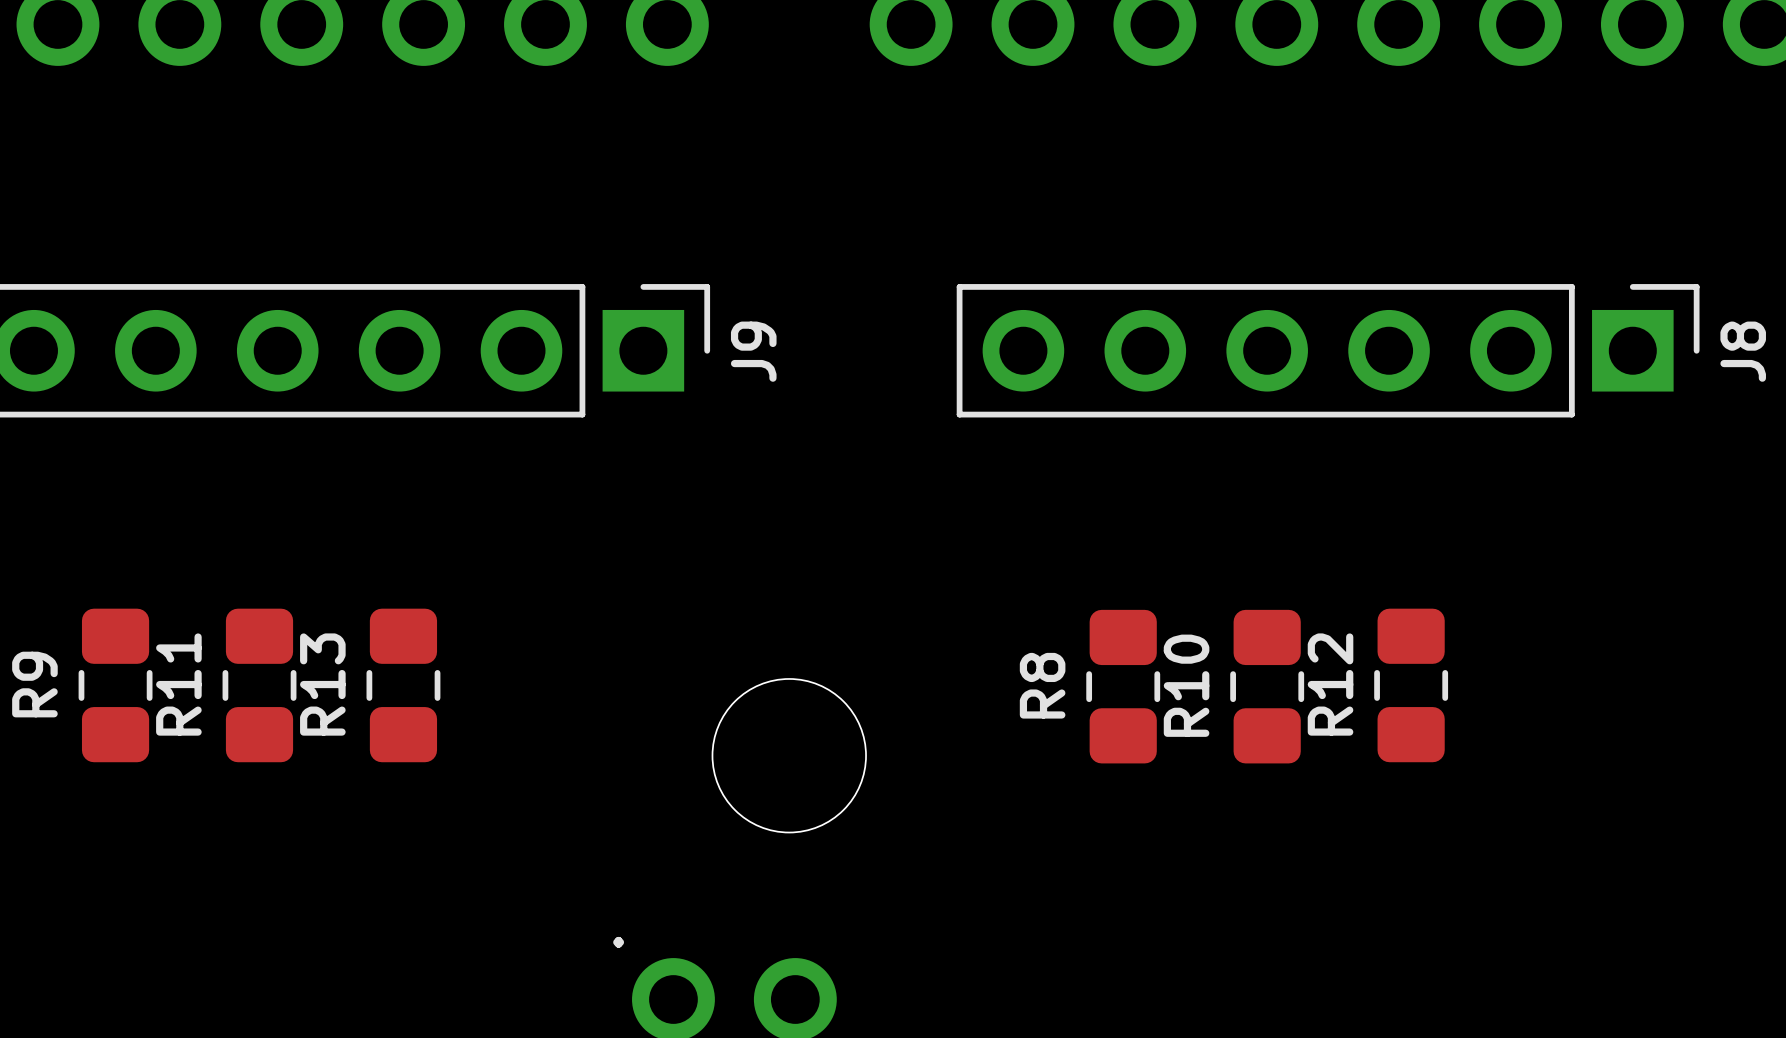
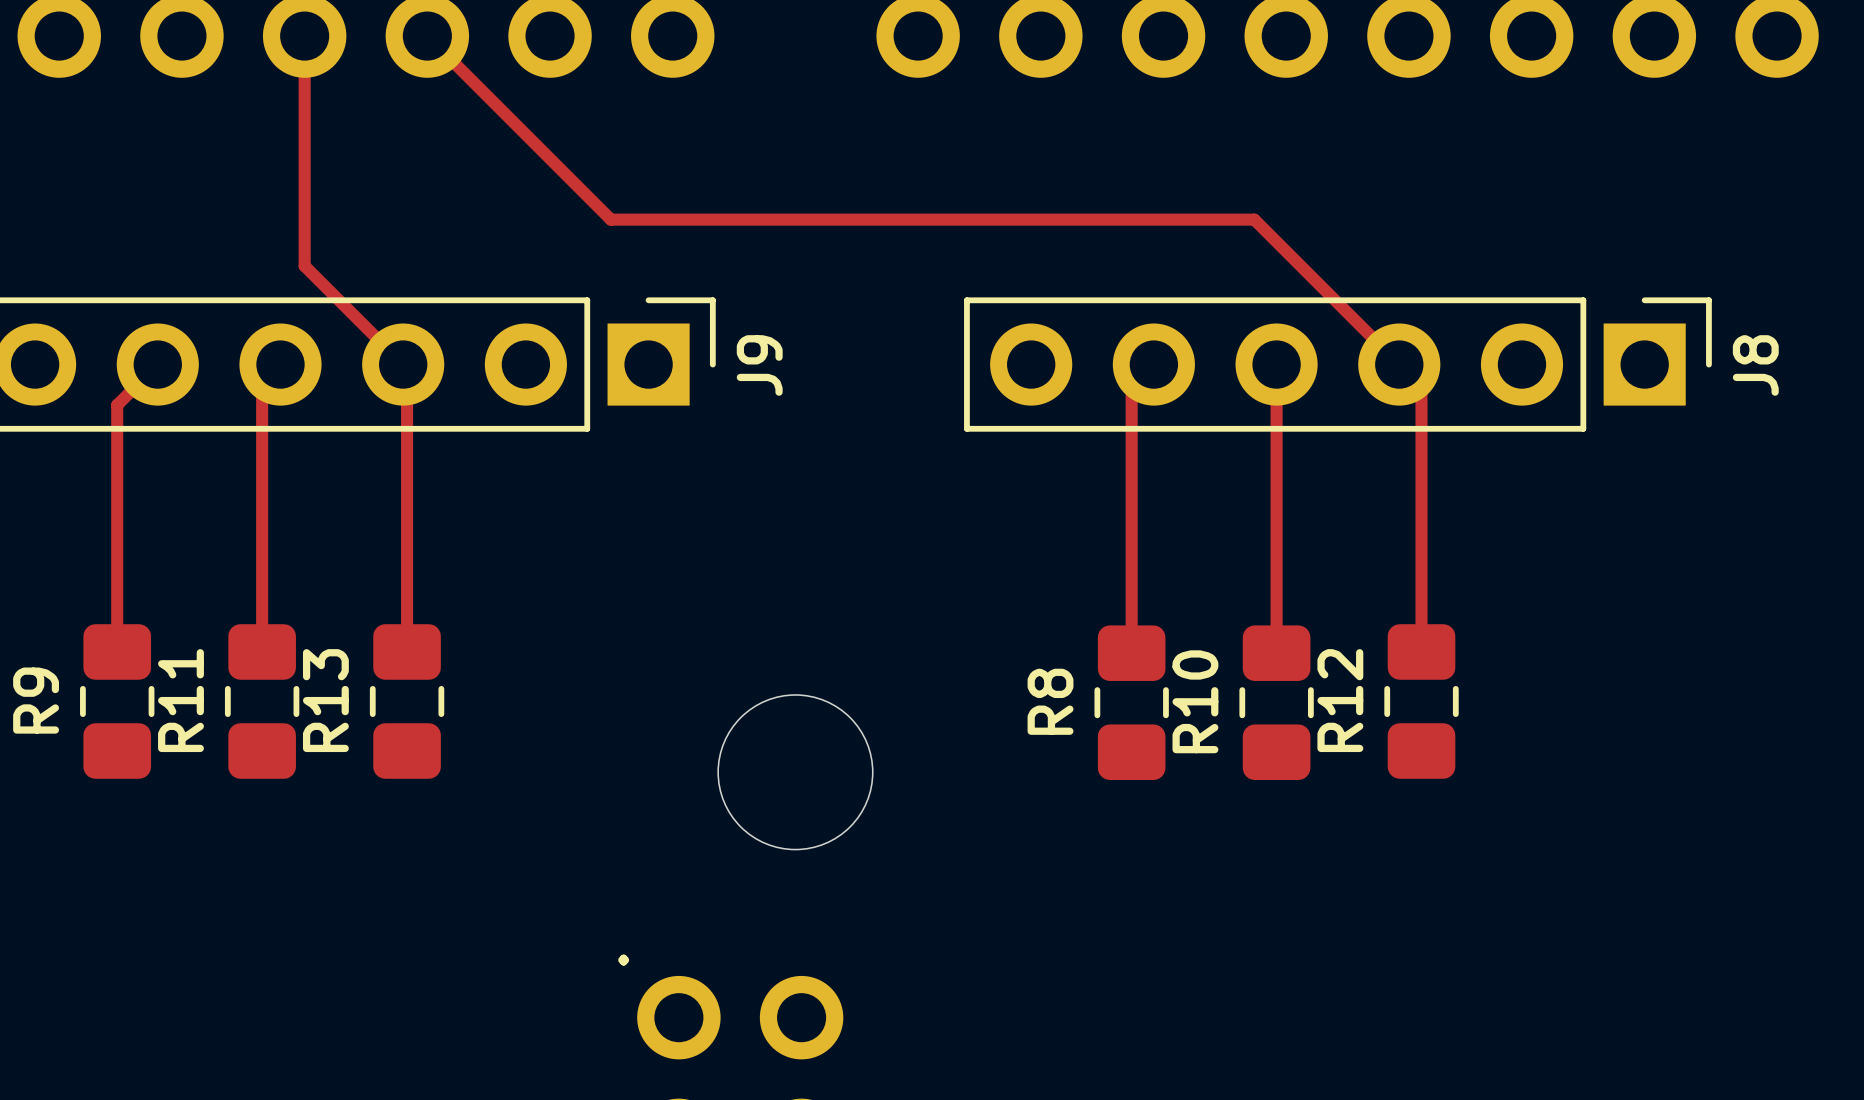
top track: none -> (304, 36) (304, 266) (407, 368) (407, 651)
top track: none -> (427, 36) (610, 219) (1254, 219) (1421, 386) (1421, 651)
top track: none -> (157, 364) (117, 405) (117, 651)
top track: none -> (280, 364) (262, 382) (262, 651)
top track: none -> (1153, 364) (1131, 386) (1131, 653)
top track: none -> (1276, 364) (1276, 653)

